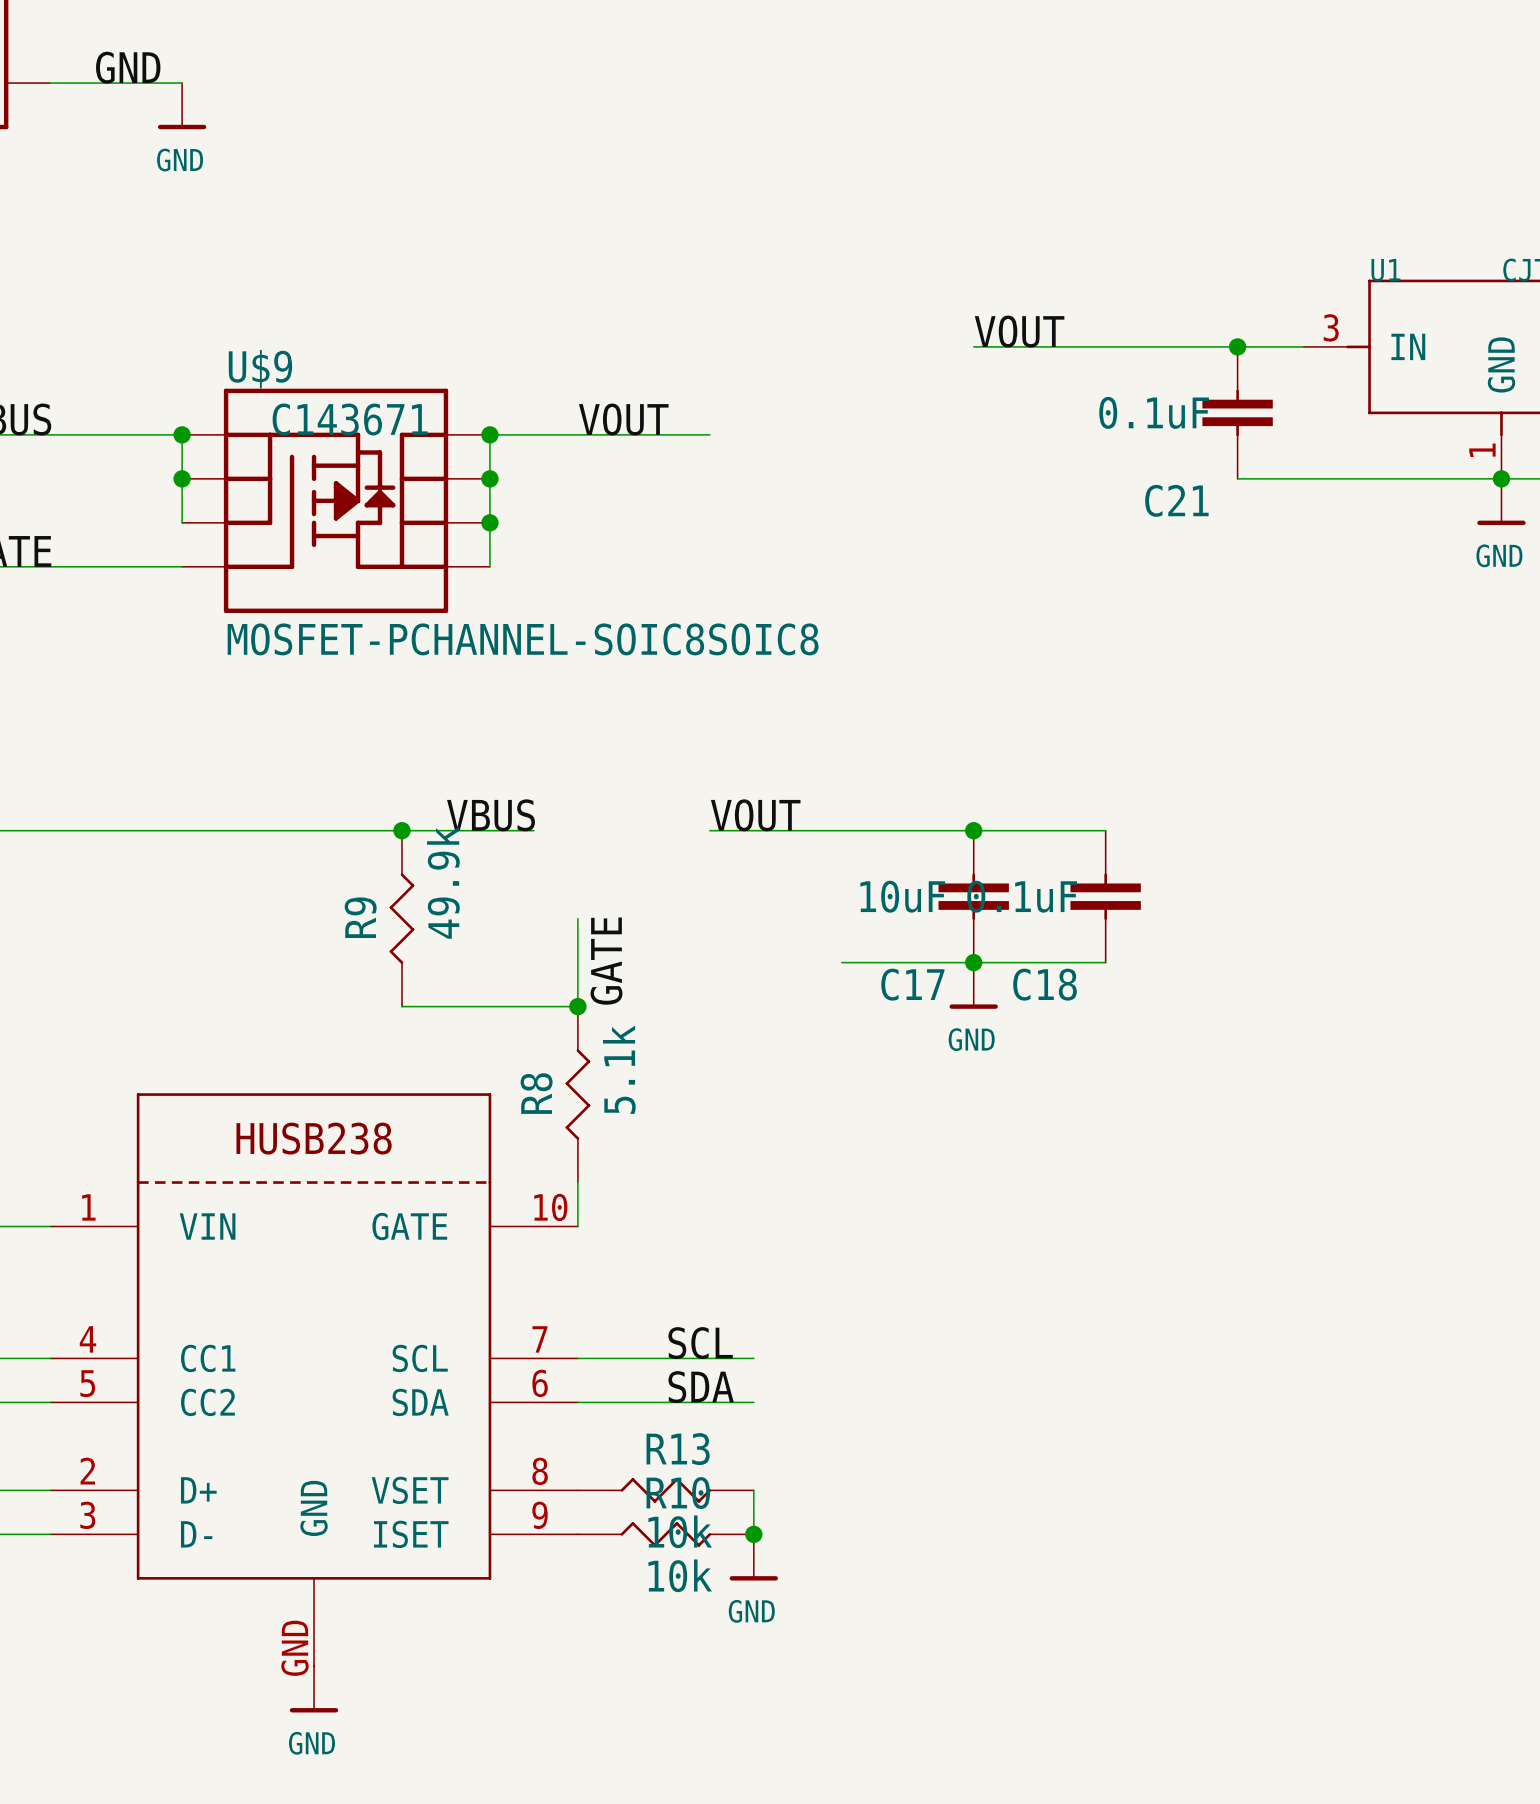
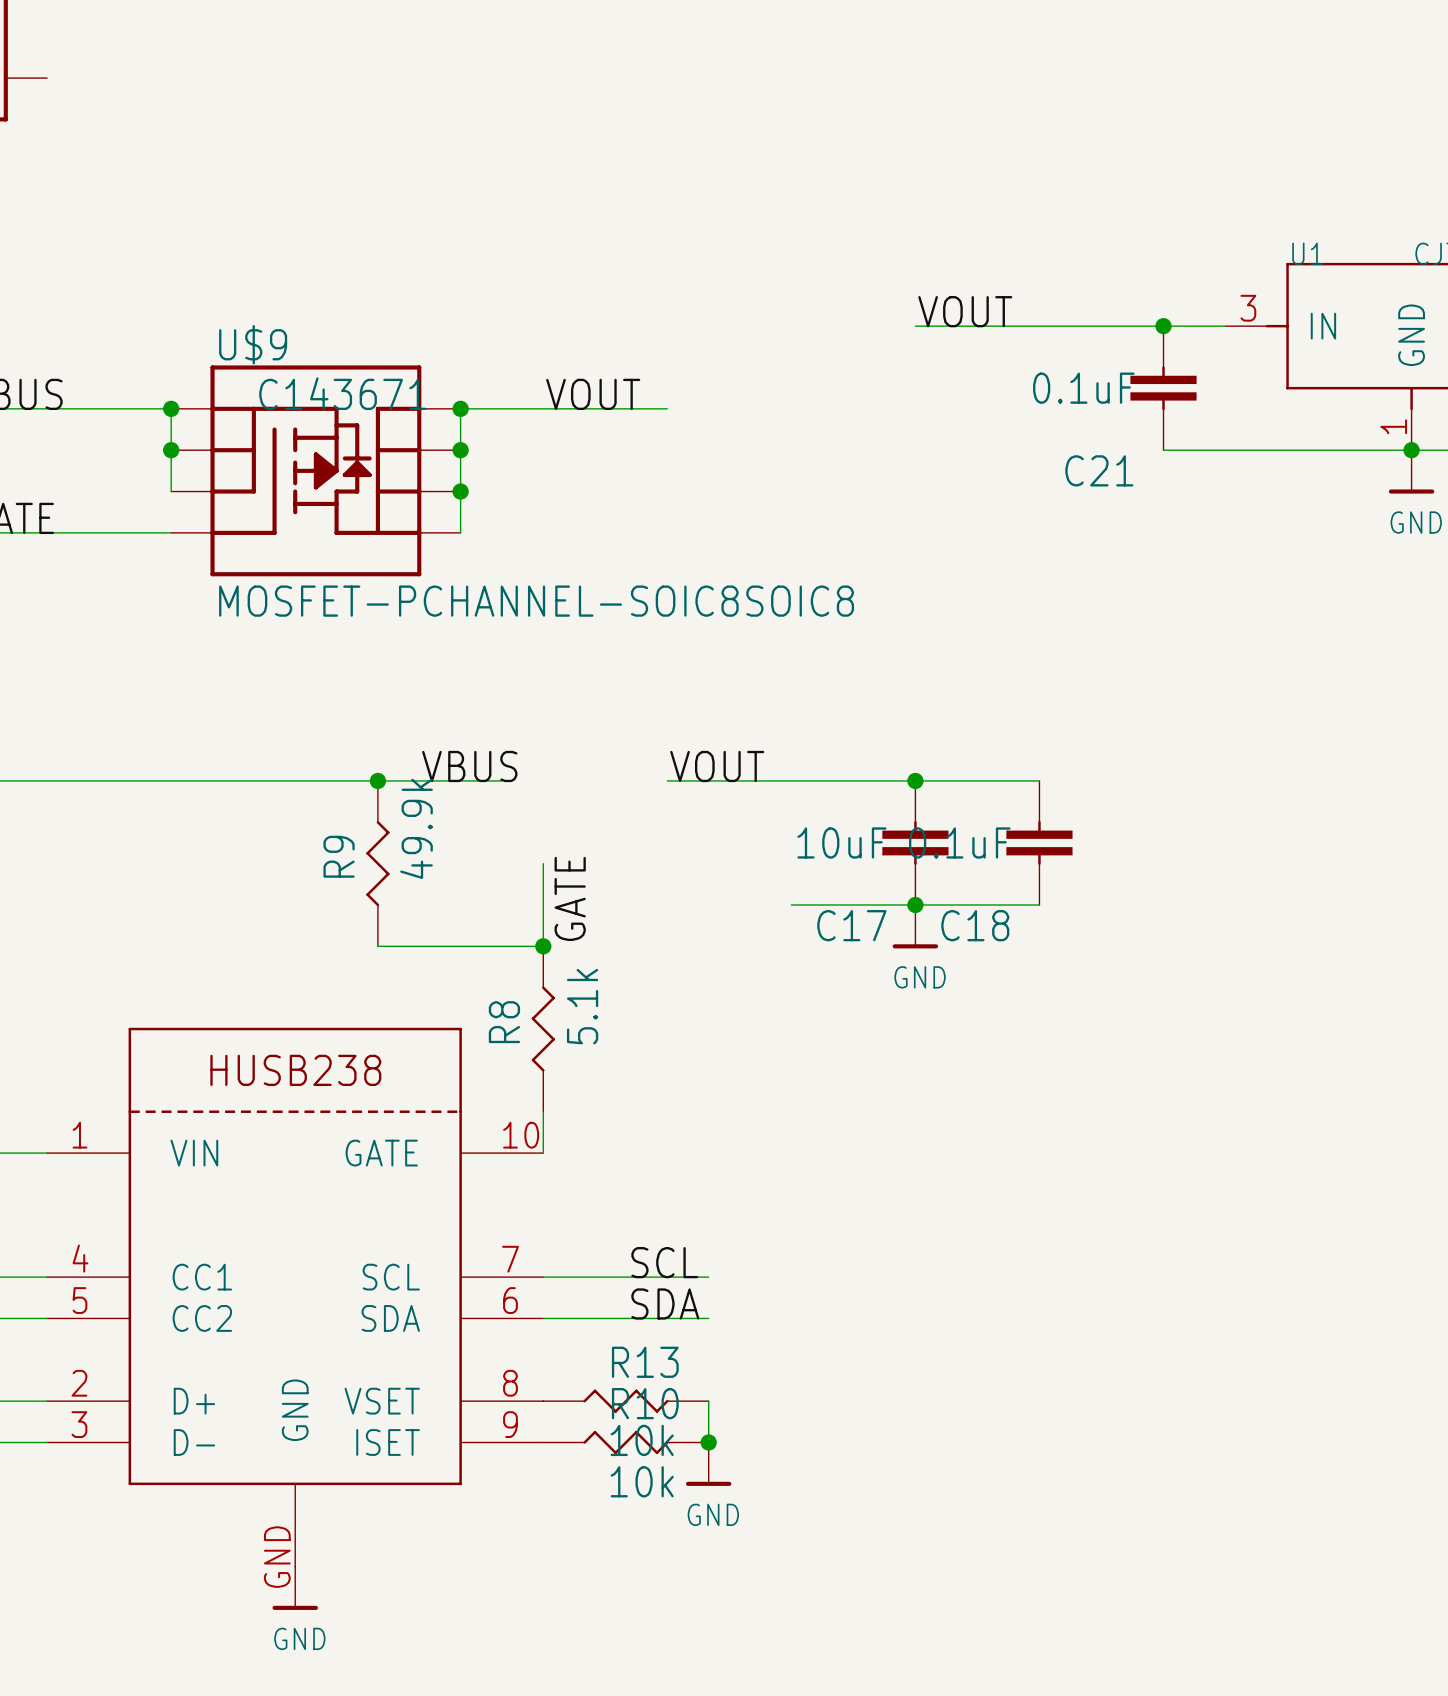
label: GND (128, 67) -> none
wire: (50, 83) (182, 83) -> none
power symbol: GND (182, 106) -> none

